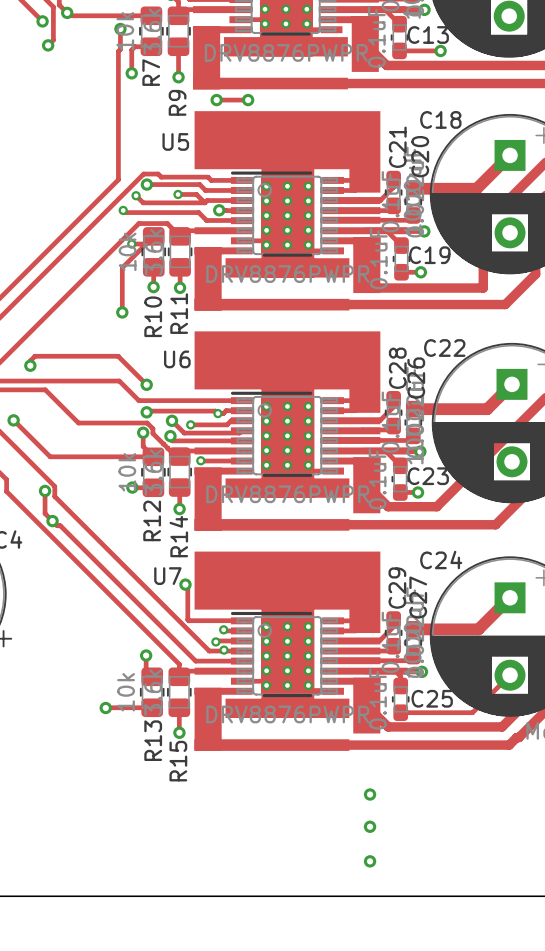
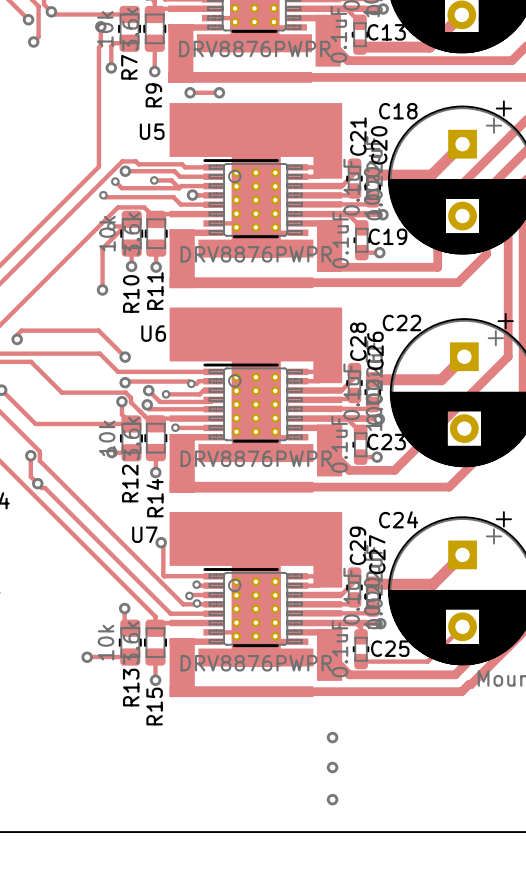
track: none -> (461, 14) (429, 47) (398, 47)
track width: thin (399, 50) (440, 50) -> thick (359, 47) (398, 47)
via: (440, 50) -> none

